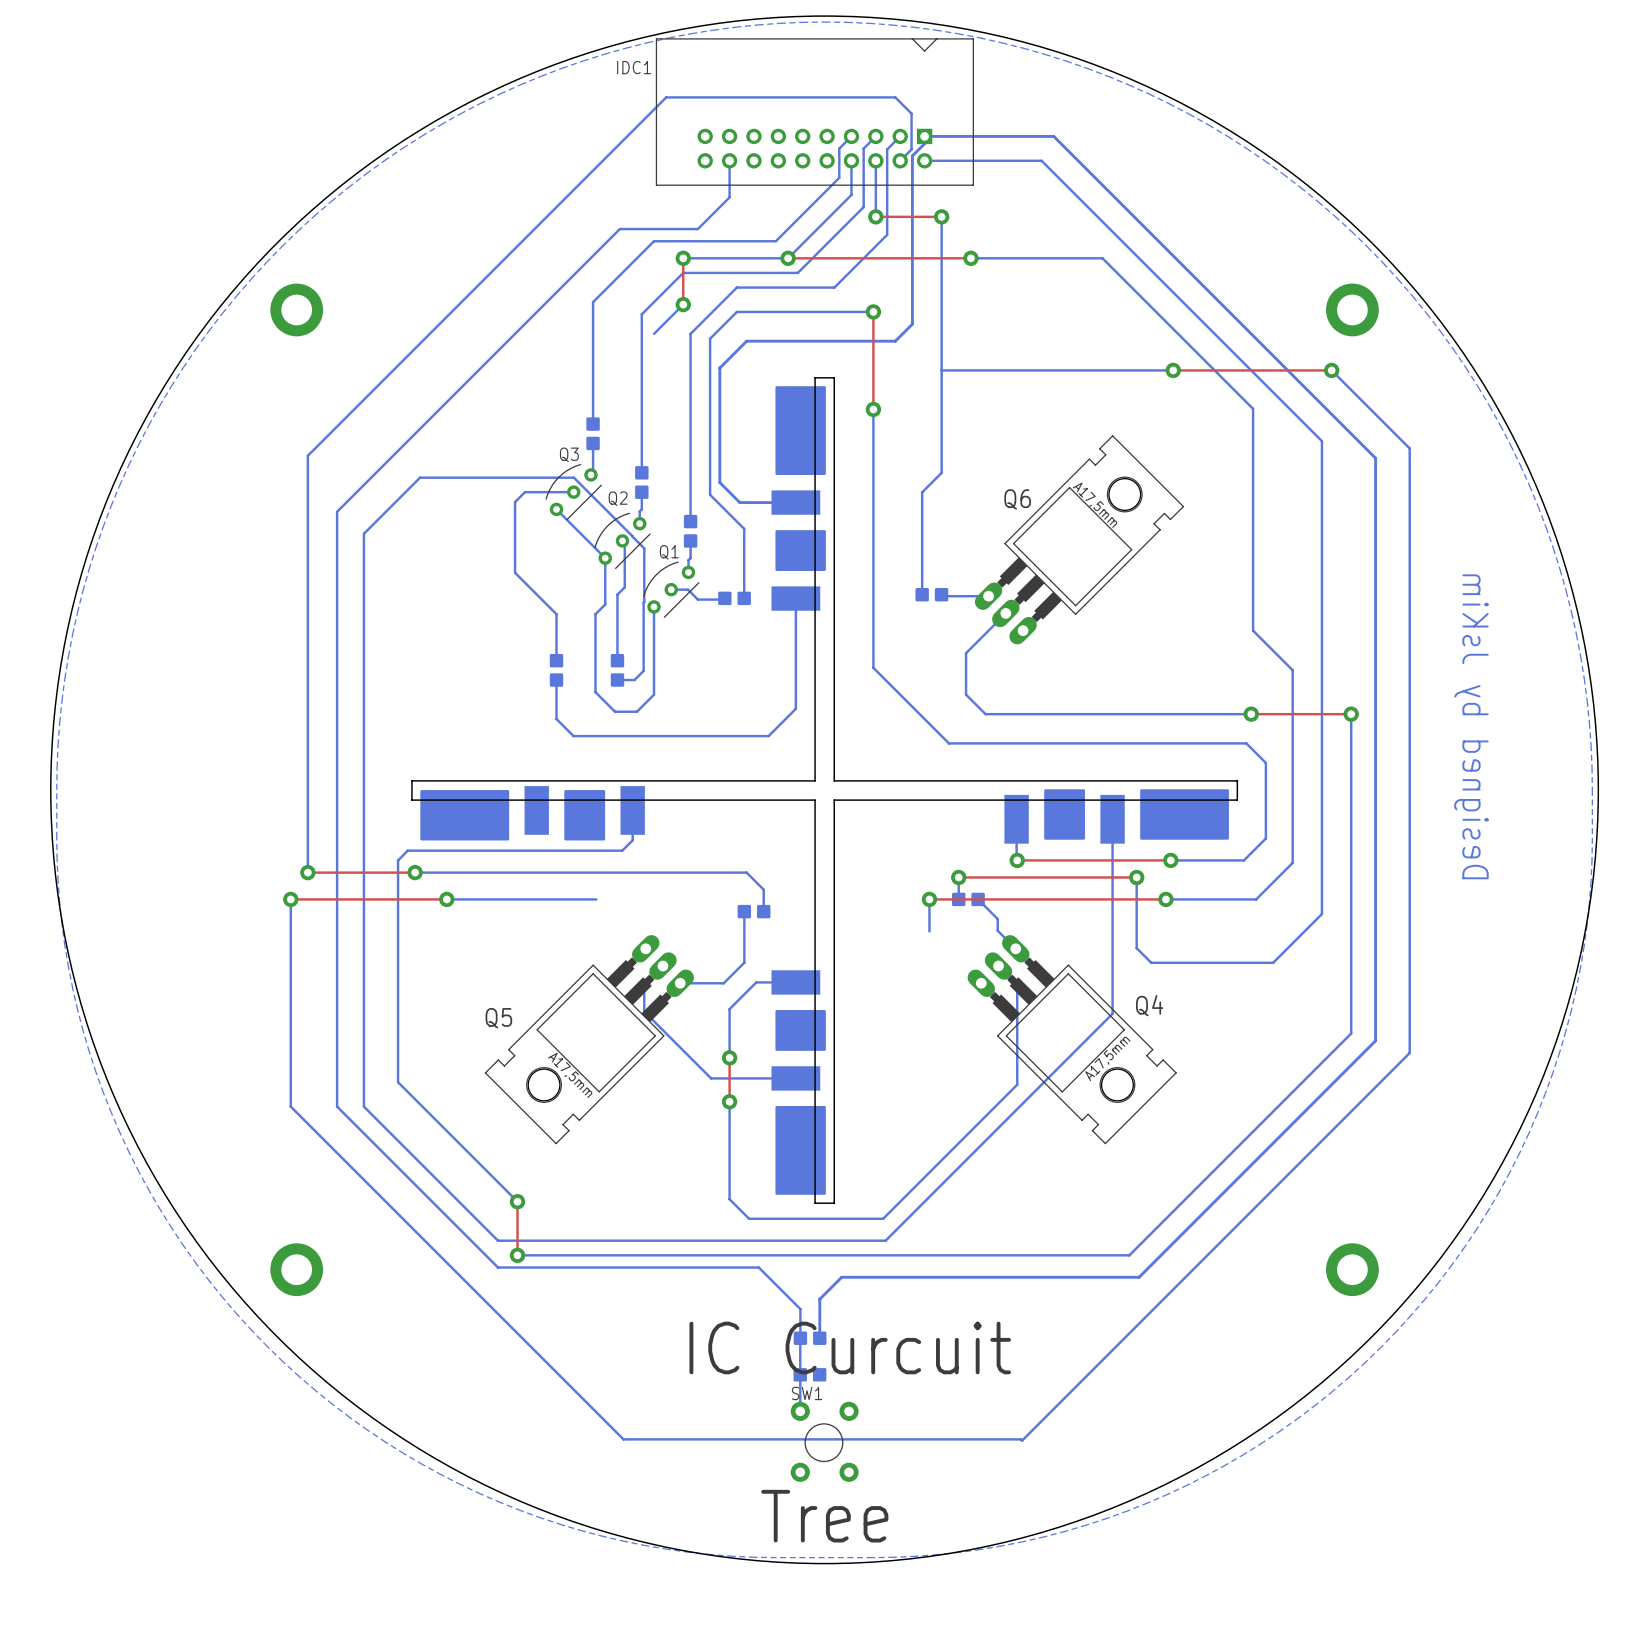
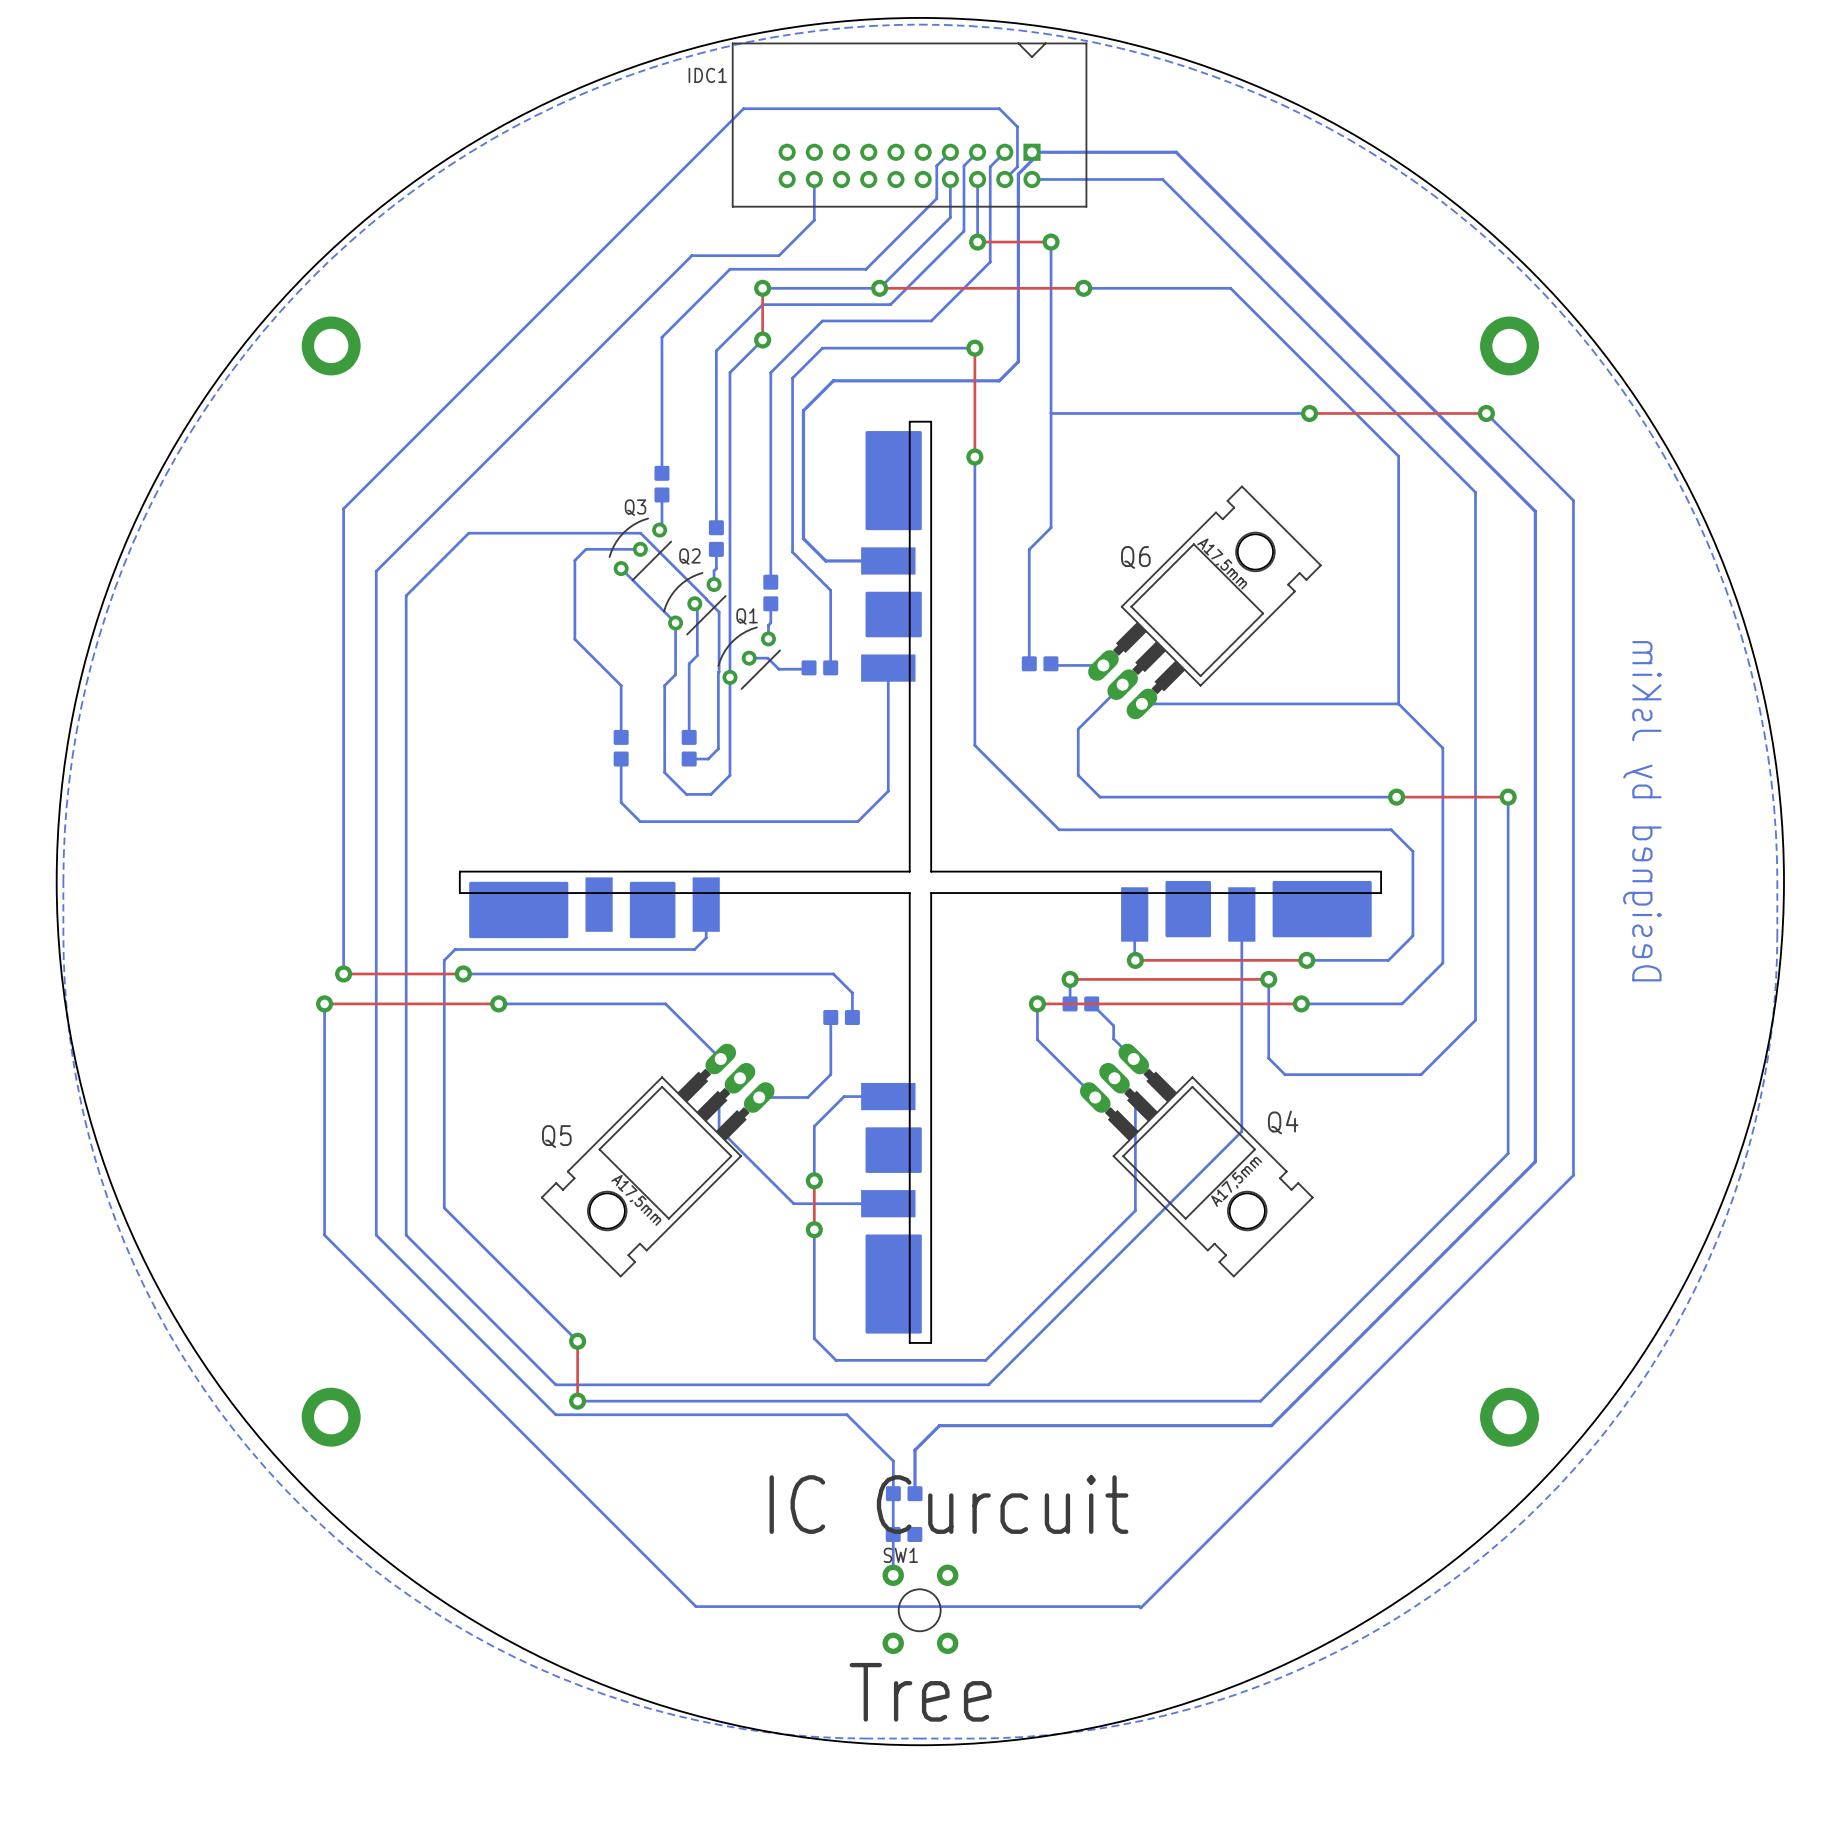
bottom track: none -> (729, 372) (729, 677)
bottom track: none -> (1141, 703) (1398, 703)
bottom track: none -> (665, 1003) (720, 1059)
bottom track: none -> (1037, 1039) (1095, 1097)

